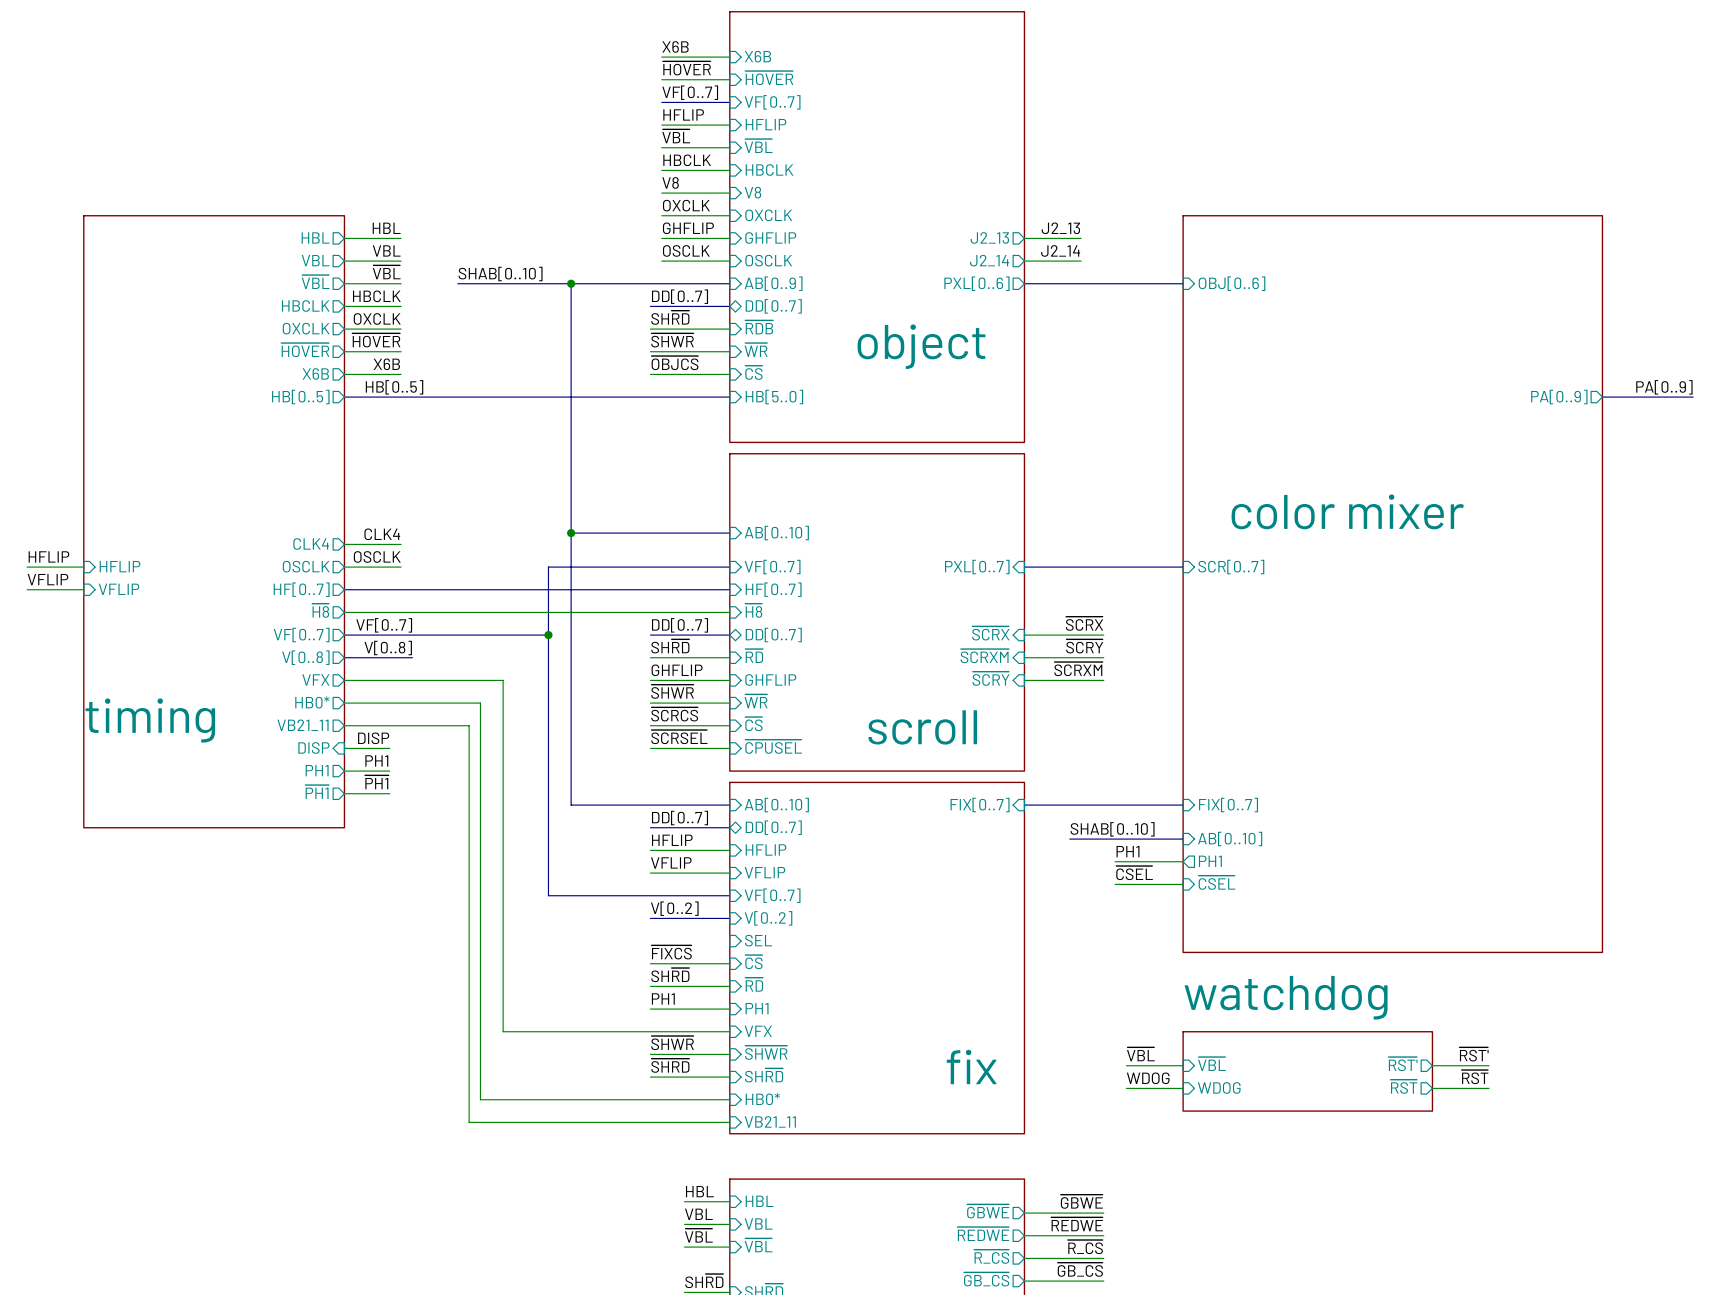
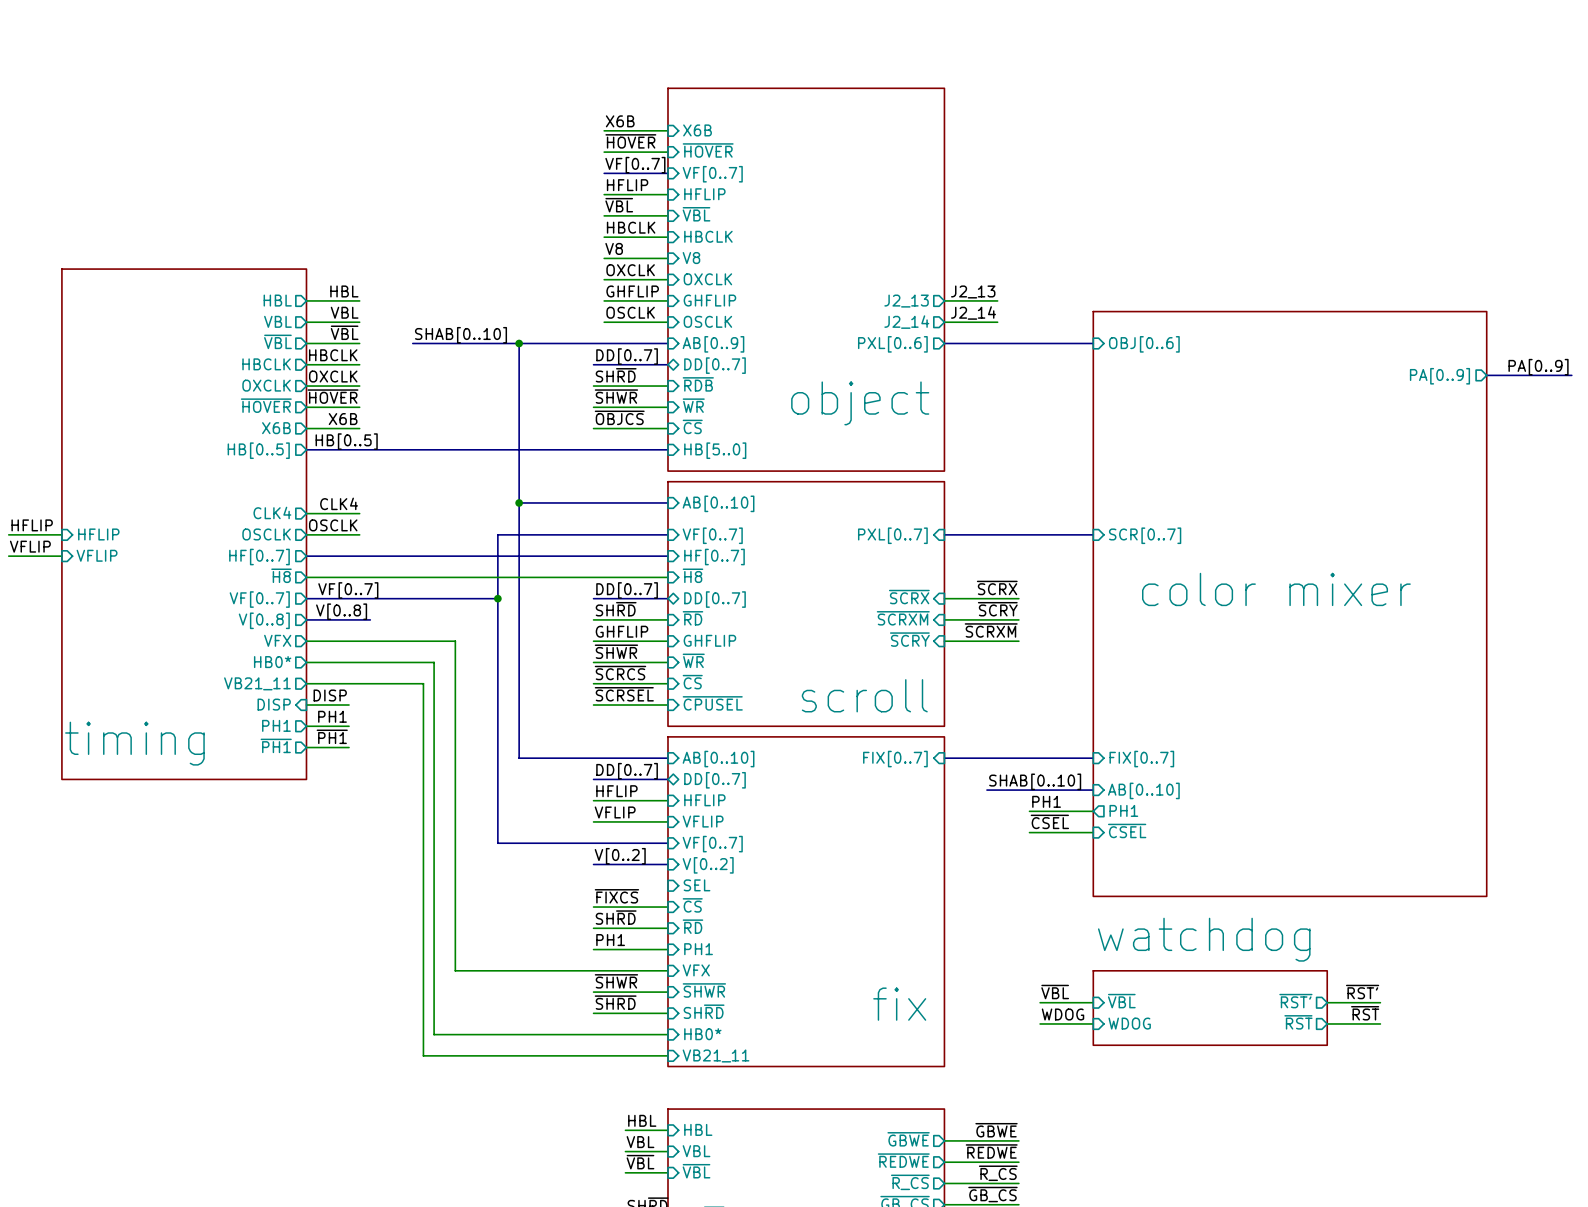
label position: X6B (675, 46) -> X6B (620, 121)
sheet pin position: X6B (757, 56) -> X6B (697, 130)
wire: (661, 57) (729, 57) -> (604, 130) (667, 130)
label position: ~{HOVER} (686, 68) -> ~{HOVER} (630, 141)
sheet pin position: ~{HOVER} (769, 78) -> ~{HOVER} (708, 150)
wire: (661, 79) (729, 79) -> (604, 152) (667, 152)
label position: VF[0..7] (690, 92) -> VF[0..7] (635, 165)
bus: (661, 102) (729, 102) -> (604, 173) (667, 173)
sheet pin position: VF[0..7] (772, 102) -> VF[0..7] (712, 174)
label position: HFLIP (683, 114) -> HFLIP (627, 185)
sheet pin position: HFLIP (766, 124) -> HFLIP (704, 194)
wire: (661, 125) (729, 125) -> (604, 194) (667, 194)
label position: ~{VBL} (676, 136) -> ~{VBL} (619, 205)
sheet pin position: ~{VBL} (758, 146) -> ~{VBL} (696, 214)
wire: (661, 147) (729, 147) -> (604, 215) (667, 215)
label position: HBCLK (687, 160) -> HBCLK (631, 227)
sheet pin position: HBCLK (769, 169) -> HBCLK (708, 236)
wire: (661, 170) (729, 170) -> (604, 237) (667, 237)
label position: V8 (670, 182) -> V8 (614, 248)
sheet pin position: V8 (752, 192) -> V8 (691, 258)
wire: (661, 193) (729, 193) -> (604, 258) (667, 258)
label position: OXCLK (686, 205) -> OXCLK (630, 270)
wire: (661, 215) (729, 215) -> (604, 279) (667, 279)
sheet pin position: OXCLK (768, 215) -> OXCLK (707, 279)
sheet object: (877, 227) -> none
label position: HBL (386, 228) -> HBL (344, 291)
label position: GHFLIP (688, 228) -> GHFLIP (632, 291)
label position: J2_13 (1060, 228) -> J2_13 (973, 291)
sheet pin position: HBL (315, 237) -> HBL (277, 300)
sheet pin position: GHFLIP (770, 237) -> GHFLIP (709, 300)
sheet pin position: J2_13 (989, 237) -> J2_13 (906, 301)
wire: (344, 238) (401, 238) -> (306, 300) (359, 300)
wire: (661, 238) (729, 238) -> (604, 300) (667, 300)
wire: (1024, 238) (1081, 238) -> (944, 300) (997, 300)
label position: VBL (386, 250) -> VBL (344, 312)
label position: OSCLK (686, 250) -> OSCLK (630, 312)
label position: J2_14 (1060, 250) -> J2_14 (973, 312)
sheet pin position: VBL (315, 260) -> VBL (277, 321)
sheet pin position: OSCLK (768, 260) -> OSCLK (707, 321)
sheet pin position: J2_14 (989, 260) -> J2_14 (906, 322)
wire: (344, 261) (401, 261) -> (306, 322) (359, 322)
wire: (661, 261) (729, 261) -> (604, 322) (667, 322)
wire: (1024, 261) (1081, 261) -> (944, 322) (997, 322)
label position: ~{VBL} (386, 272) -> ~{VBL} (344, 332)
label position: SHAB[0..10] (500, 274) -> SHAB[0..10] (460, 335)
sheet pin position: ~{VBL} (315, 282) -> ~{VBL} (277, 341)
wire: (344, 283) (401, 283) -> (306, 343) (359, 343)
bus: (457, 283) (729, 283) -> (412, 343) (667, 343)
bus: (571, 283) (571, 363) -> none
junction: (571, 283) -> none
sheet pin position: AB[0..9] (773, 283) -> AB[0..9] (713, 344)
sheet pin position: PXL[0..6] (976, 283) -> PXL[0..6] (892, 344)
bus: (1024, 283) (1183, 283) -> (944, 343) (1093, 343)
sheet pin position: OBJ[0..6] (1232, 283) -> OBJ[0..6] (1144, 344)
sheet object: none -> (806, 279)
label position: HBCLK (376, 296) -> HBCLK (333, 355)
label position: DD[0..7] (680, 296) -> DD[0..7] (627, 356)
sheet pin position: HBCLK (305, 305) -> HBCLK (266, 364)
wire: (344, 306) (401, 306) -> (306, 364) (359, 364)
bus: (650, 306) (729, 306) -> (593, 364) (667, 364)
sheet pin position: DD[0..7] (773, 306) -> DD[0..7] (714, 365)
label position: SH~{RD} (670, 317) -> SH~{RD} (616, 375)
label position: OXCLK (377, 318) -> OXCLK (333, 376)
sheet pin position: ~{RDB} (759, 327) -> ~{RDB} (698, 384)
sheet pin position: OXCLK (306, 328) -> OXCLK (266, 385)
wire: (344, 329) (401, 329) -> (306, 386) (359, 386)
wire: (650, 329) (729, 329) -> (593, 386) (667, 386)
label position: ~{HOVER} (376, 340) -> ~{HOVER} (332, 396)
label position: ~{SHWR} (672, 340) -> ~{SHWR} (616, 396)
sheet pin position: ~{HOVER} (305, 350) -> ~{HOVER} (266, 405)
sheet pin position: ~{WR} (756, 350) -> ~{WR} (693, 405)
wire: (344, 351) (401, 351) -> (306, 407) (359, 407)
wire: (650, 351) (729, 351) -> (593, 407) (667, 407)
junction: none -> (519, 343)
label position: ~{OBJCS} (675, 363) -> ~{OBJCS} (619, 417)
label position: X6B (386, 364) -> X6B (343, 419)
sheet pin position: ~{CS} (753, 372) -> ~{CS} (692, 426)
sheet pin position: X6B (315, 373) -> X6B (276, 428)
wire: (344, 374) (401, 374) -> (306, 428) (359, 428)
wire: (650, 374) (729, 374) -> (593, 428) (667, 428)
label position: HB[0..5] (394, 387) -> HB[0..5] (346, 441)
sheet pin position: HB[0..5] (300, 397) -> HB[0..5] (258, 450)
bus: (344, 397) (729, 397) -> (306, 449) (667, 449)
sheet pin position: HB[5..0] (774, 397) -> HB[5..0] (715, 450)
sheet timing: (214, 521) -> none
sheet timing: none -> (184, 524)
sheet color mixer: (1392, 584) -> none
sheet scroll: (877, 612) -> none
sheet scroll: none -> (806, 603)
sheet color mixer: none -> (1290, 603)

